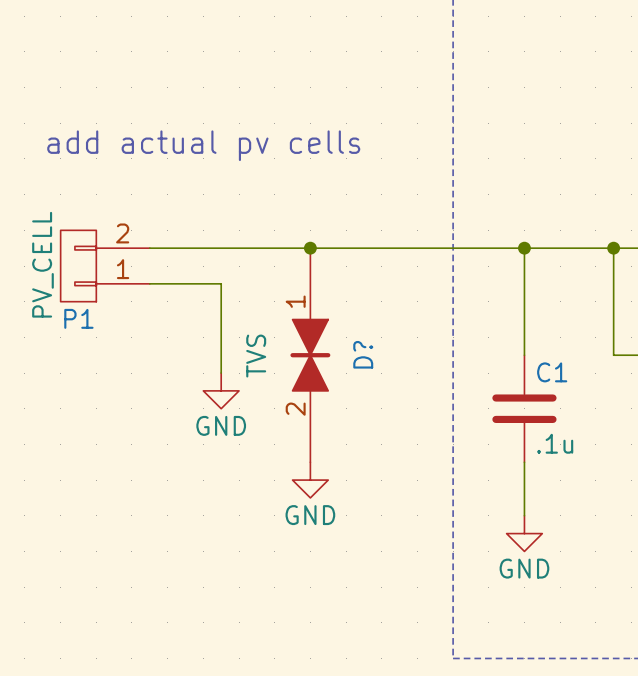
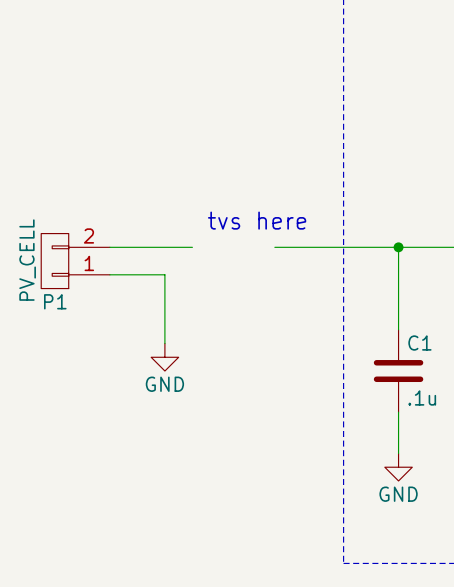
text: add actual pv cells (203, 145) -> none
text: none -> tvs here (257, 220)
wire: (256, 248) (363, 248) -> none
junction: (310, 248) -> none
D?: TVS (310, 355) -> none
power symbol: GND (310, 480) -> none

